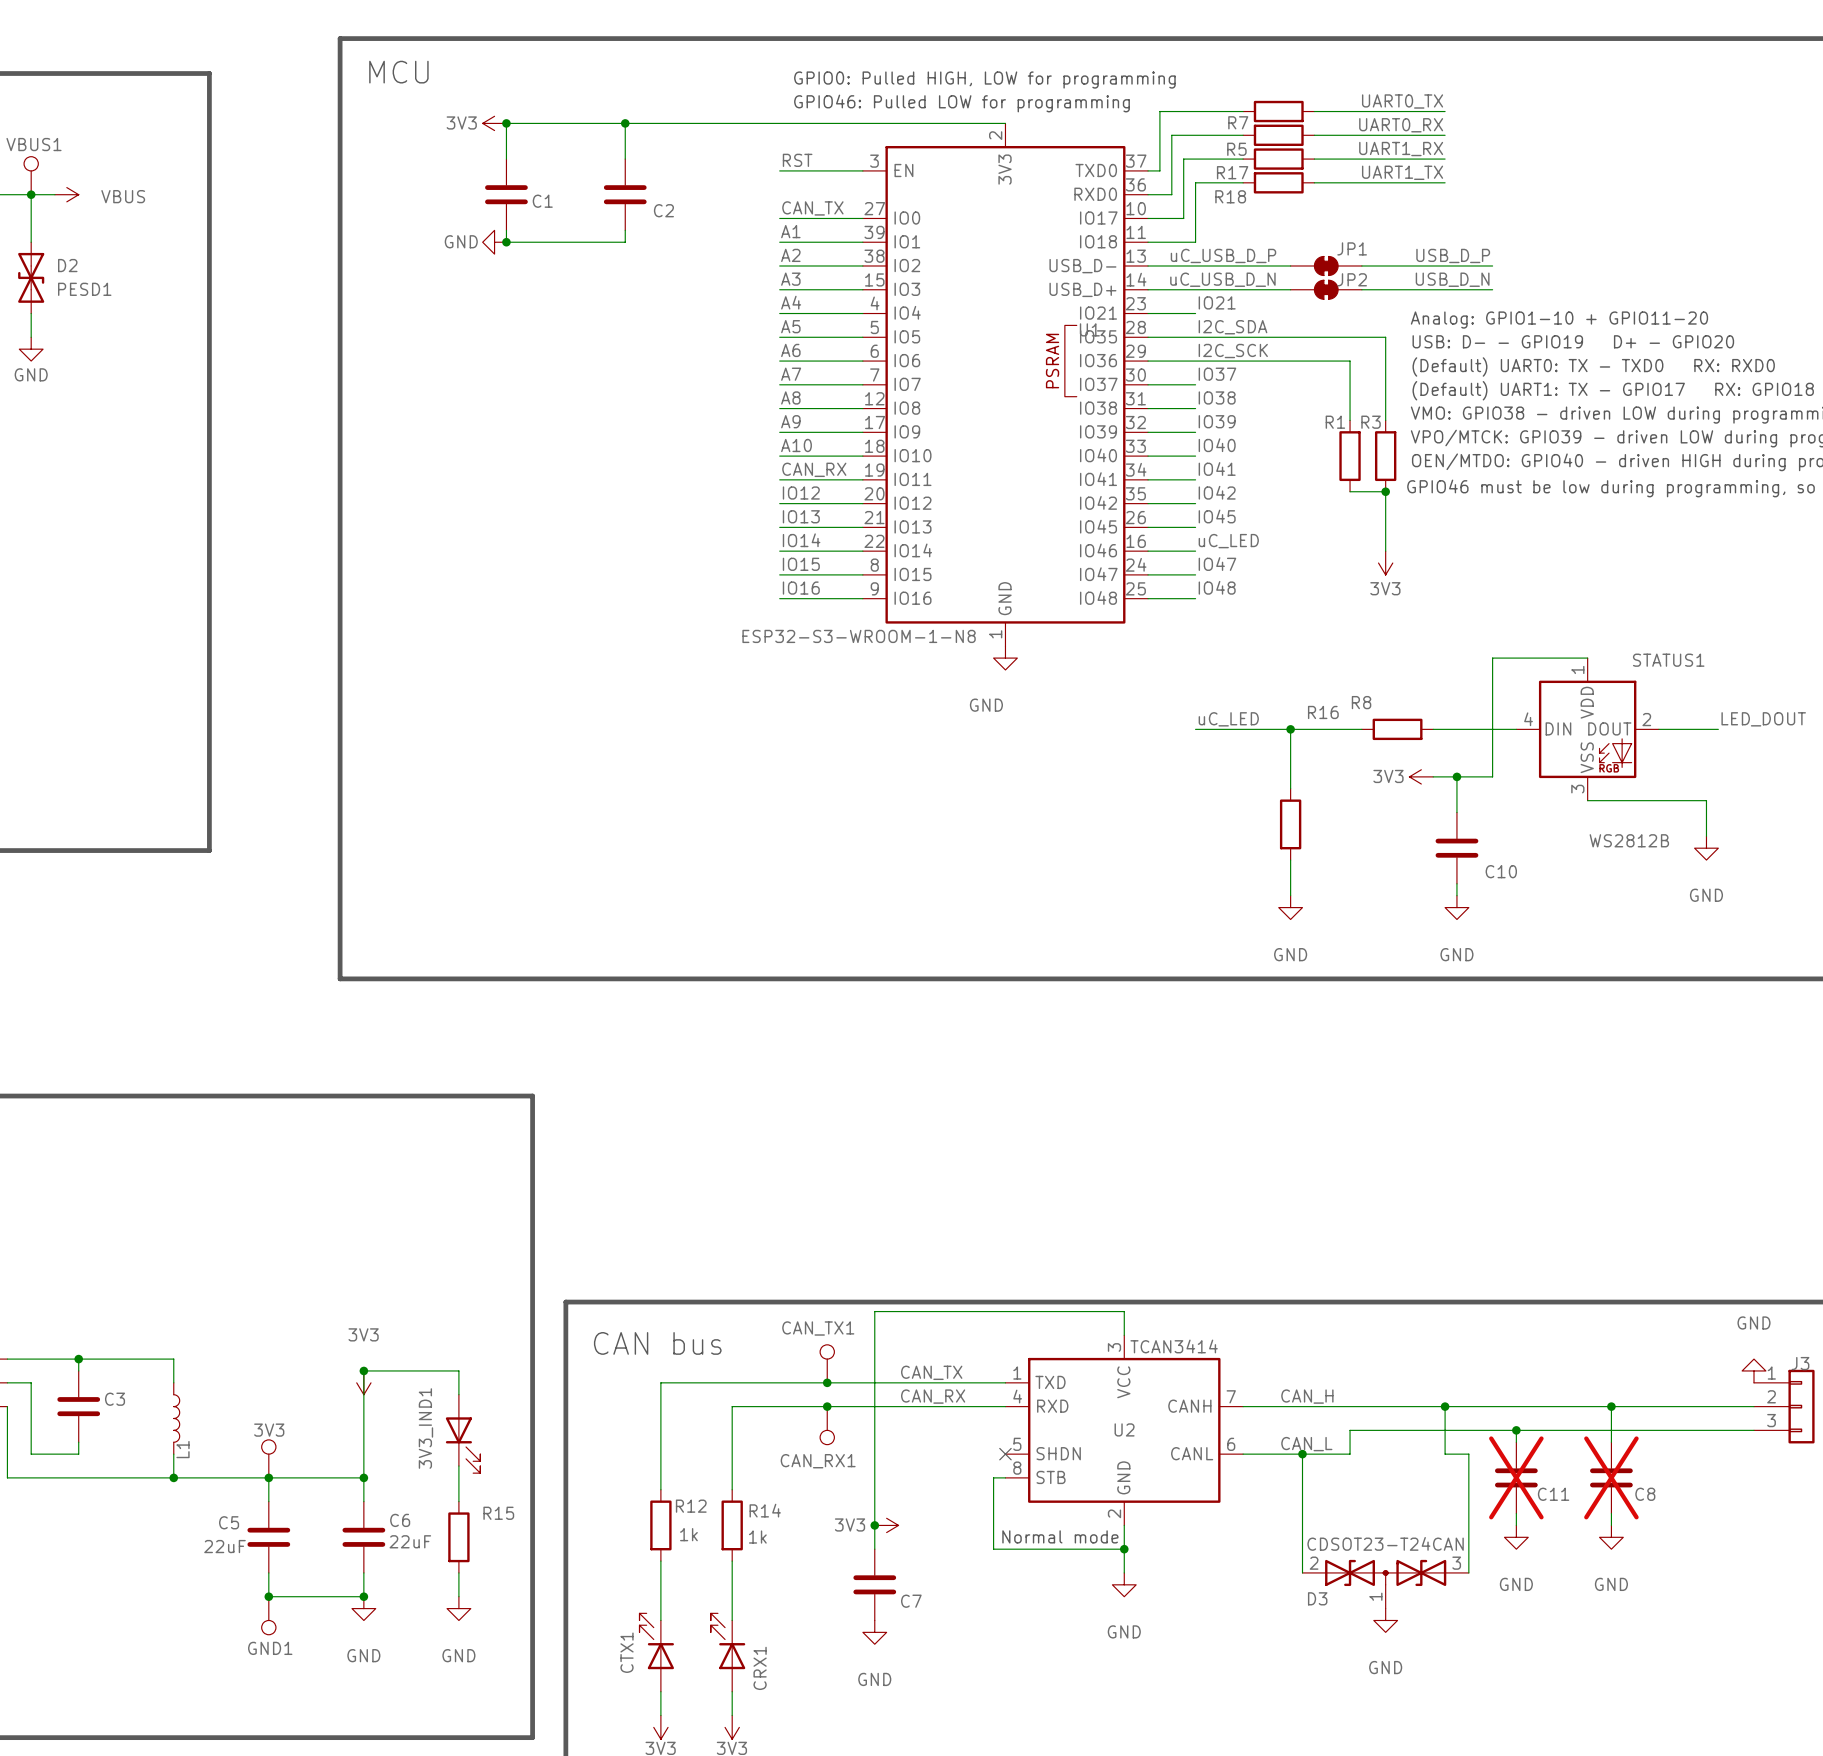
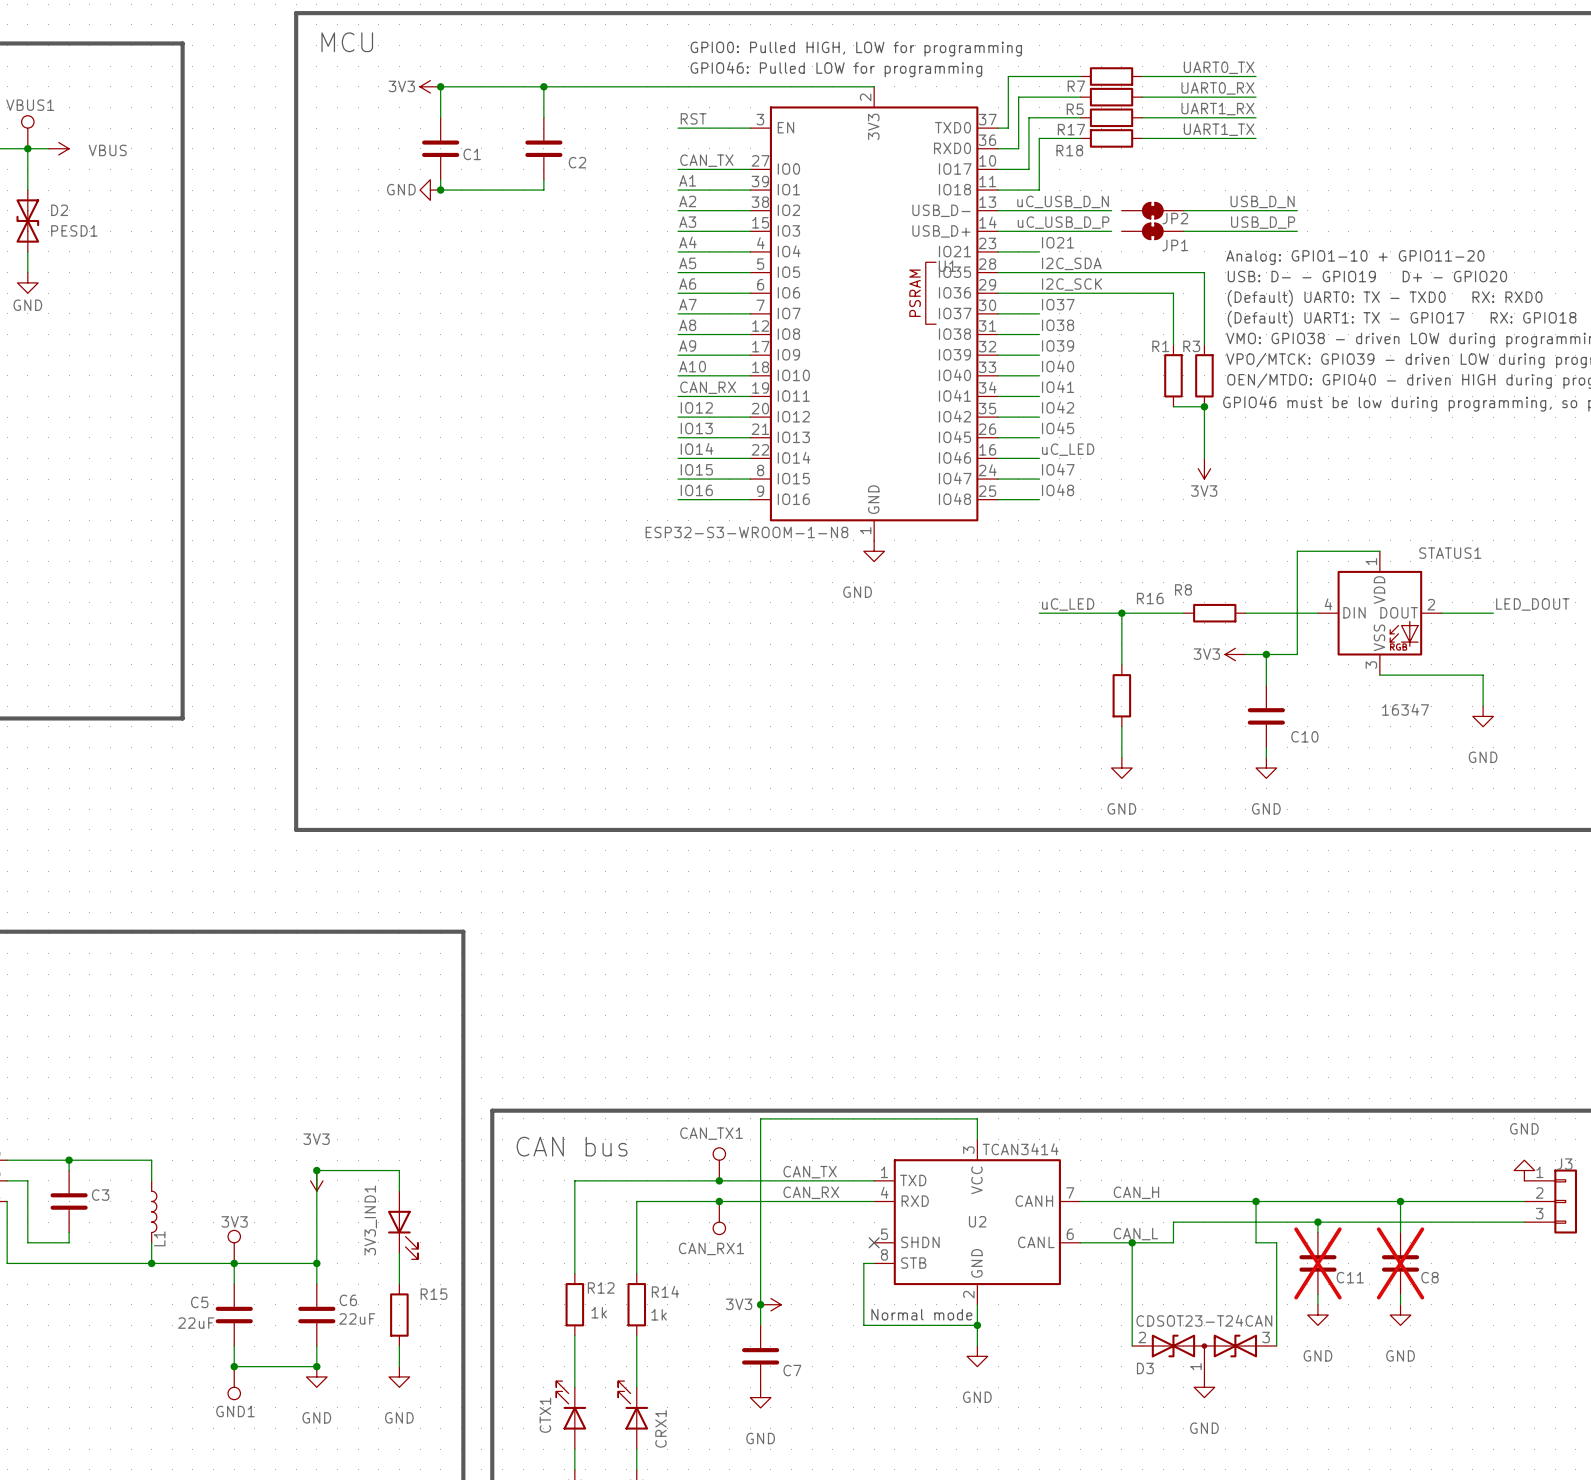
JP1 name: JP1 (1352, 248) -> JP2 (1175, 218)
label: uC_USB_D_P (1223, 255) -> uC_USB_D_N (1063, 201)
label: USB_D_P (1453, 255) -> USB_D_N (1262, 201)
wire: (1278, 265) (1290, 265) -> none
label: uC_USB_D_N (1222, 279) -> uC_USB_D_P (1063, 222)
JP2 name: JP2 (1352, 279) -> JP1 (1175, 245)
label: USB_D_N (1452, 279) -> USB_D_P (1263, 222)
wire: (1278, 289) (1290, 289) -> none
STATUS1 value: WS2812B (1629, 840) -> 16347 (1405, 709)

